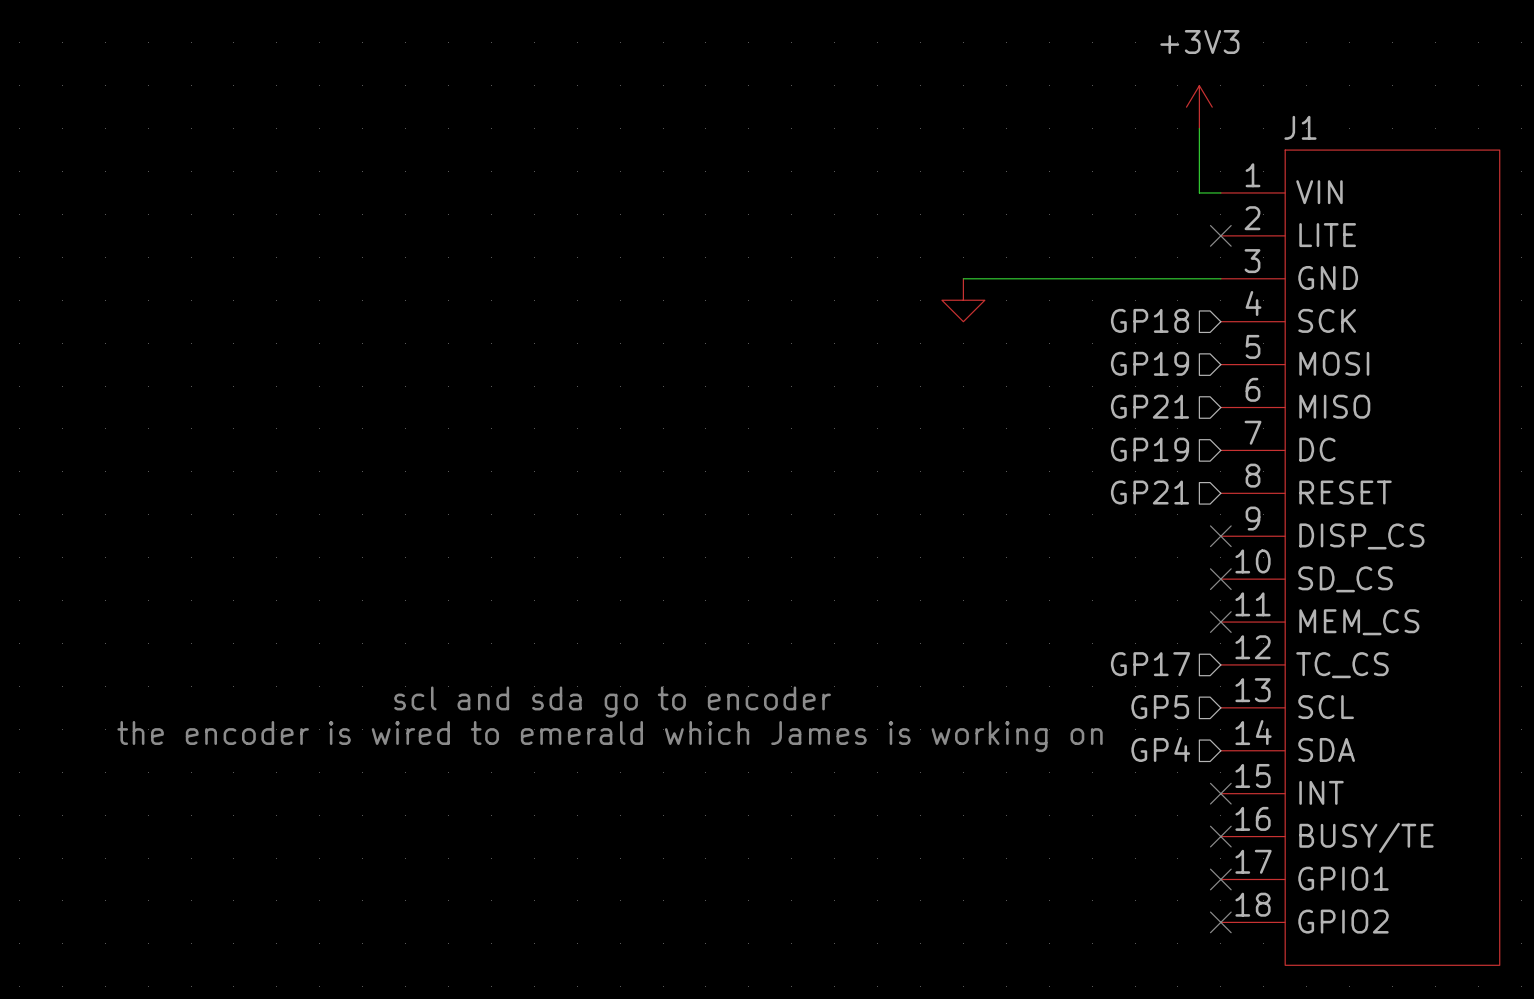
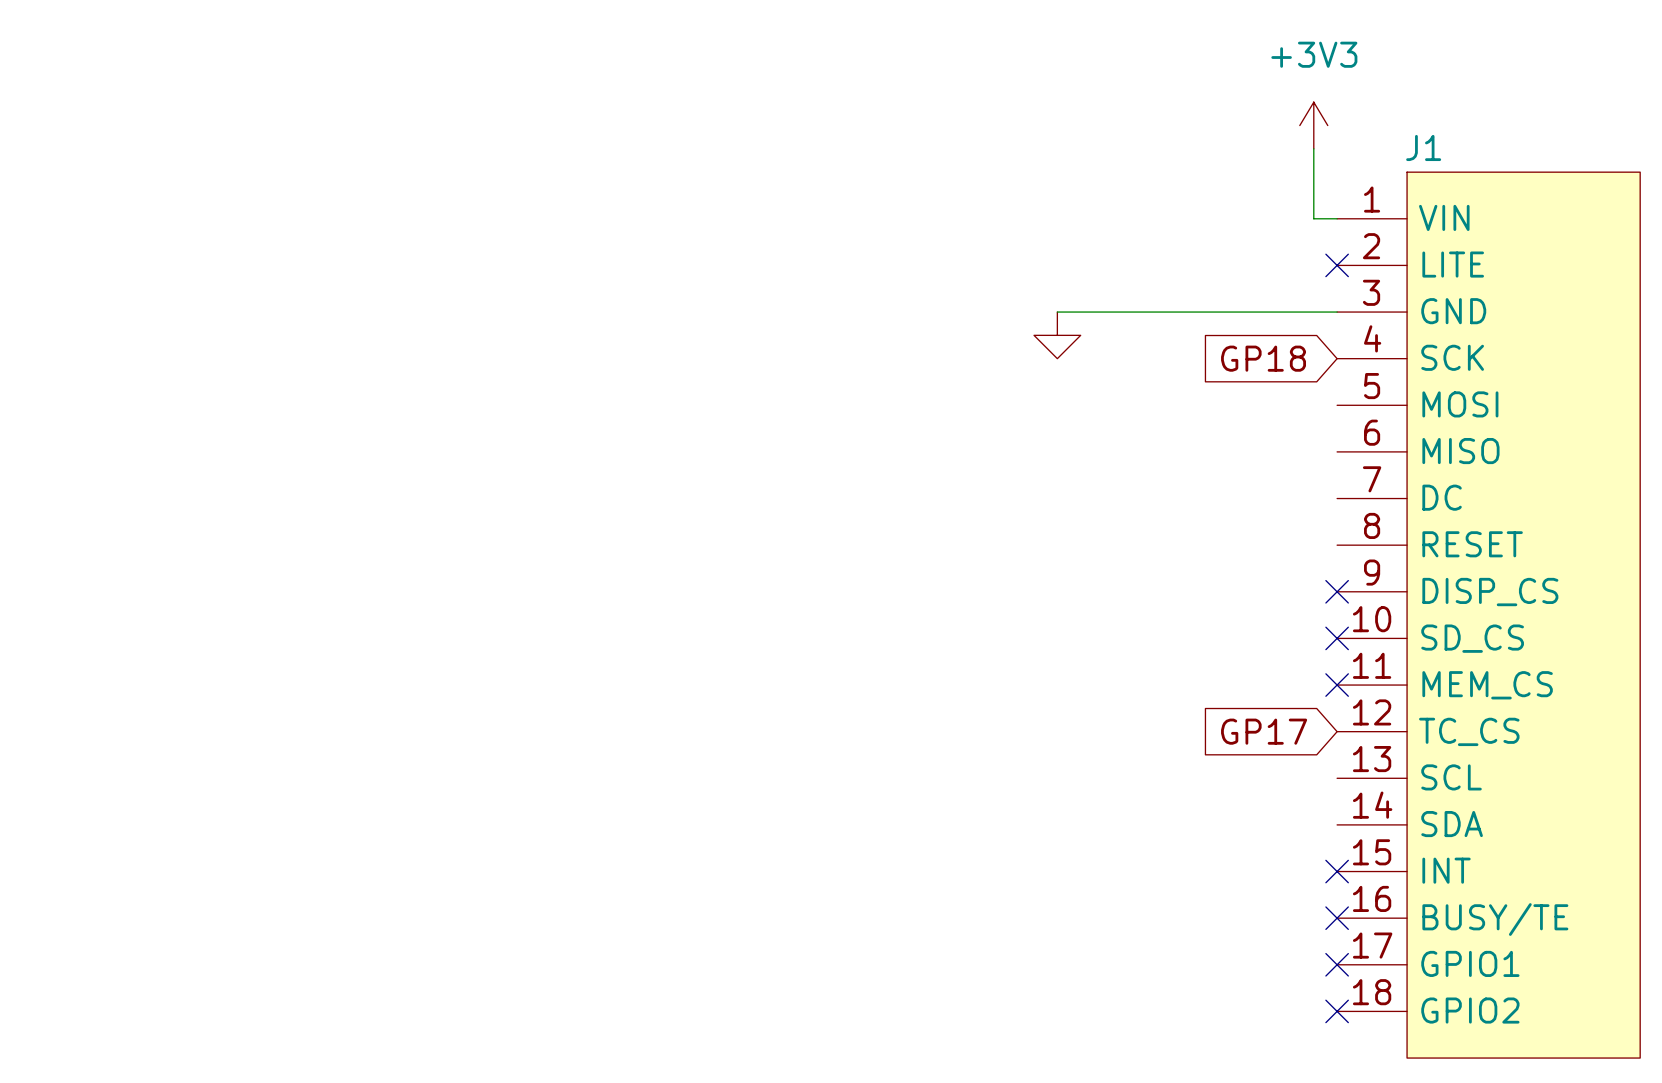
hierarchical label: GP18 (1150, 320) -> none
global label: none -> GP18 (1263, 358)
hierarchical label: GP19 (1150, 363) -> none
hierarchical label: GP21 (1150, 406) -> none
hierarchical label: GP19 (1150, 449) -> none
hierarchical label: GP21 (1150, 492) -> none
hierarchical label: GP17 (1150, 664) -> none
global label: none -> GP17 (1264, 731)
text: scl and sda go to encoder (612, 702) -> none
hierarchical label: GP5 (1160, 707) -> none
text: the encoder is wired to emerald which James is working on (610, 736) -> none
hierarchical label: GP4 (1160, 749) -> none

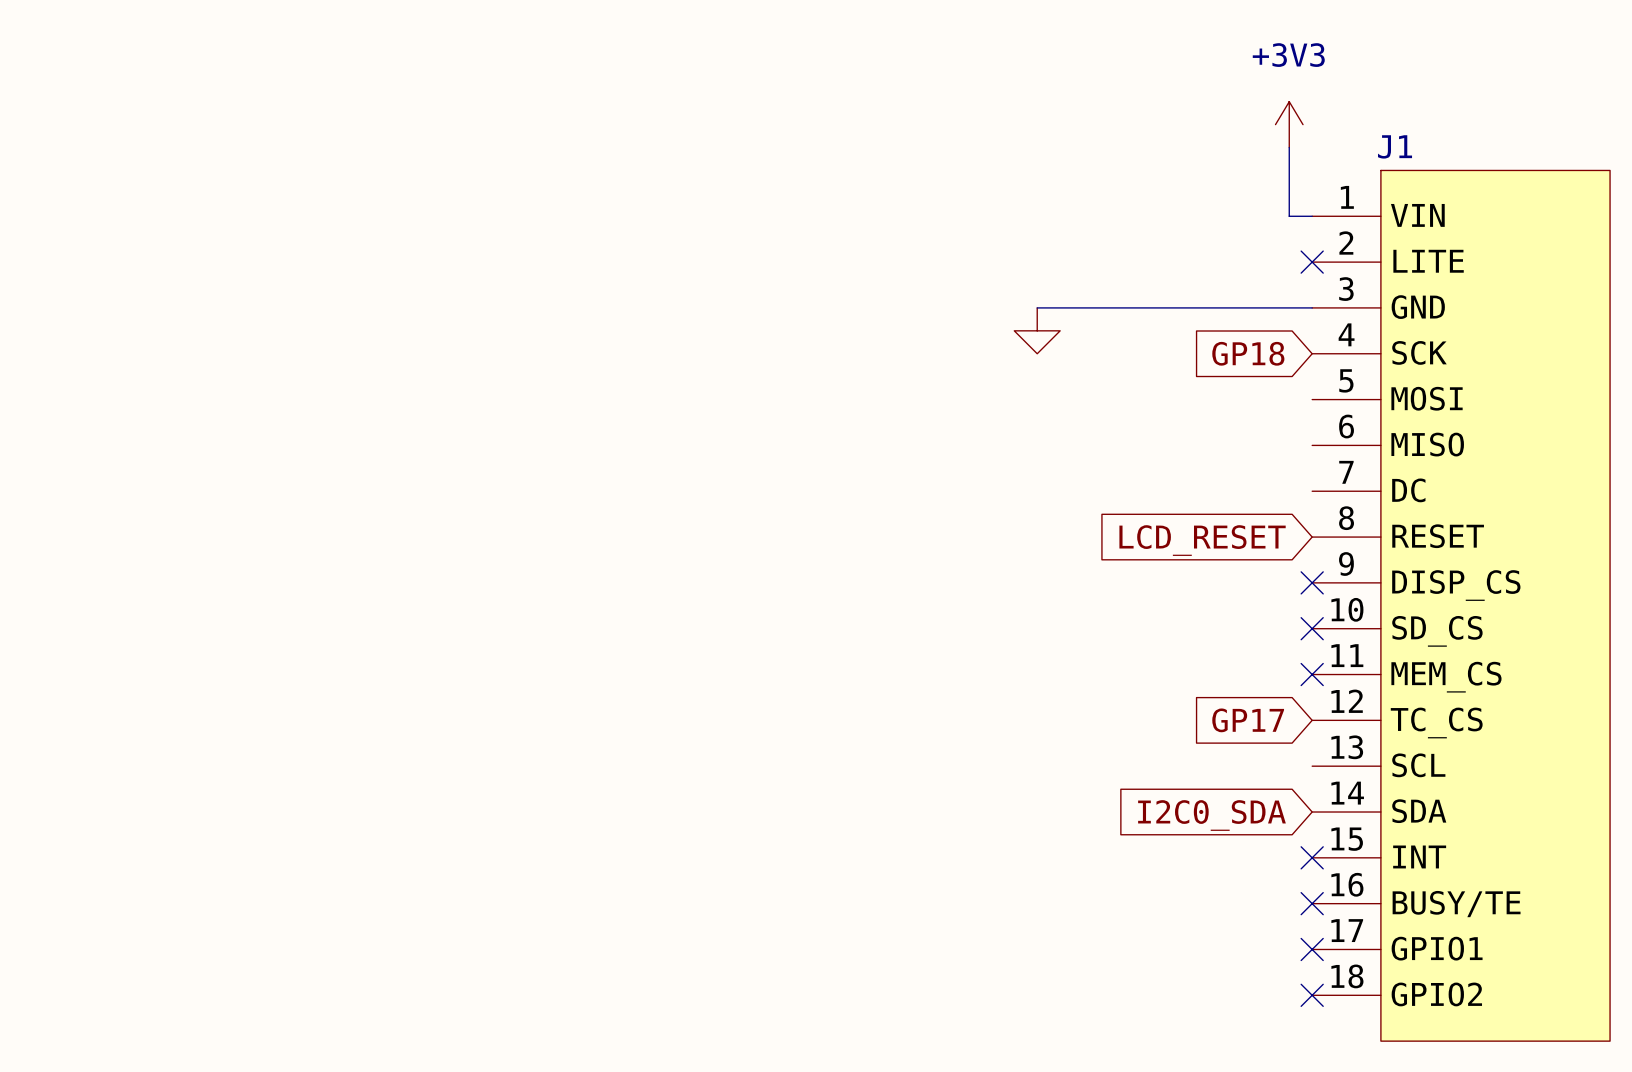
global label: none -> LCD_RESET (1202, 540)
global label: none -> I2C0_SDA (1211, 815)

